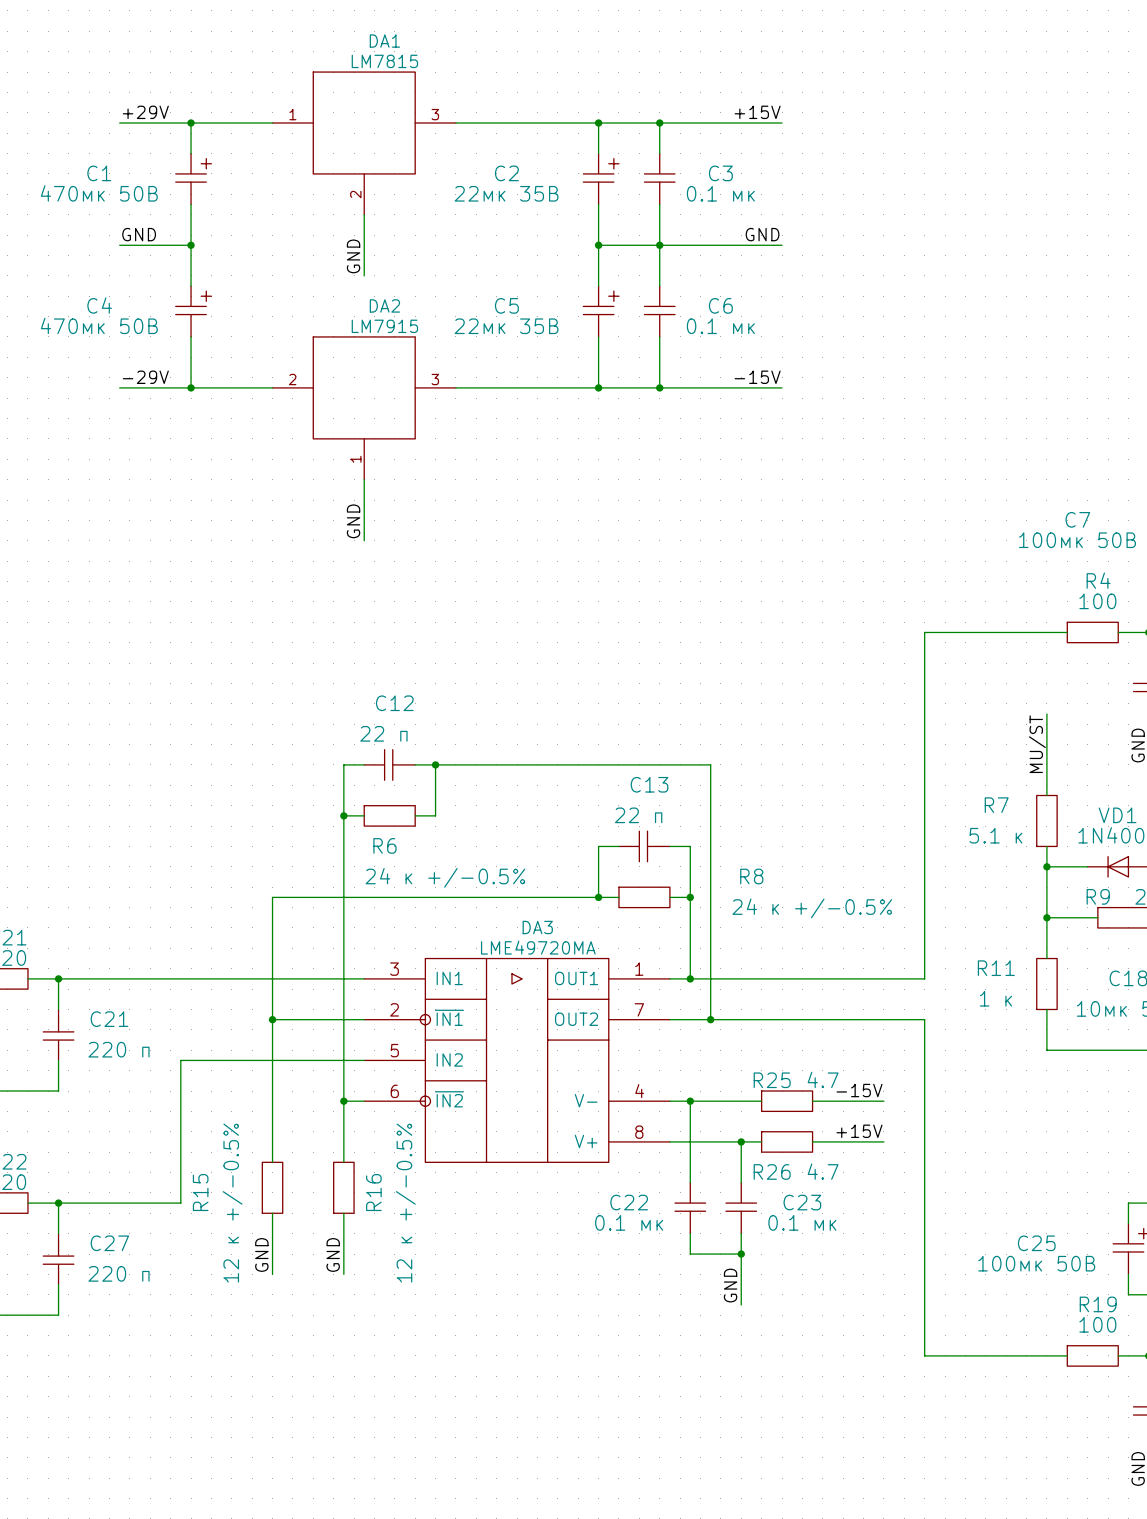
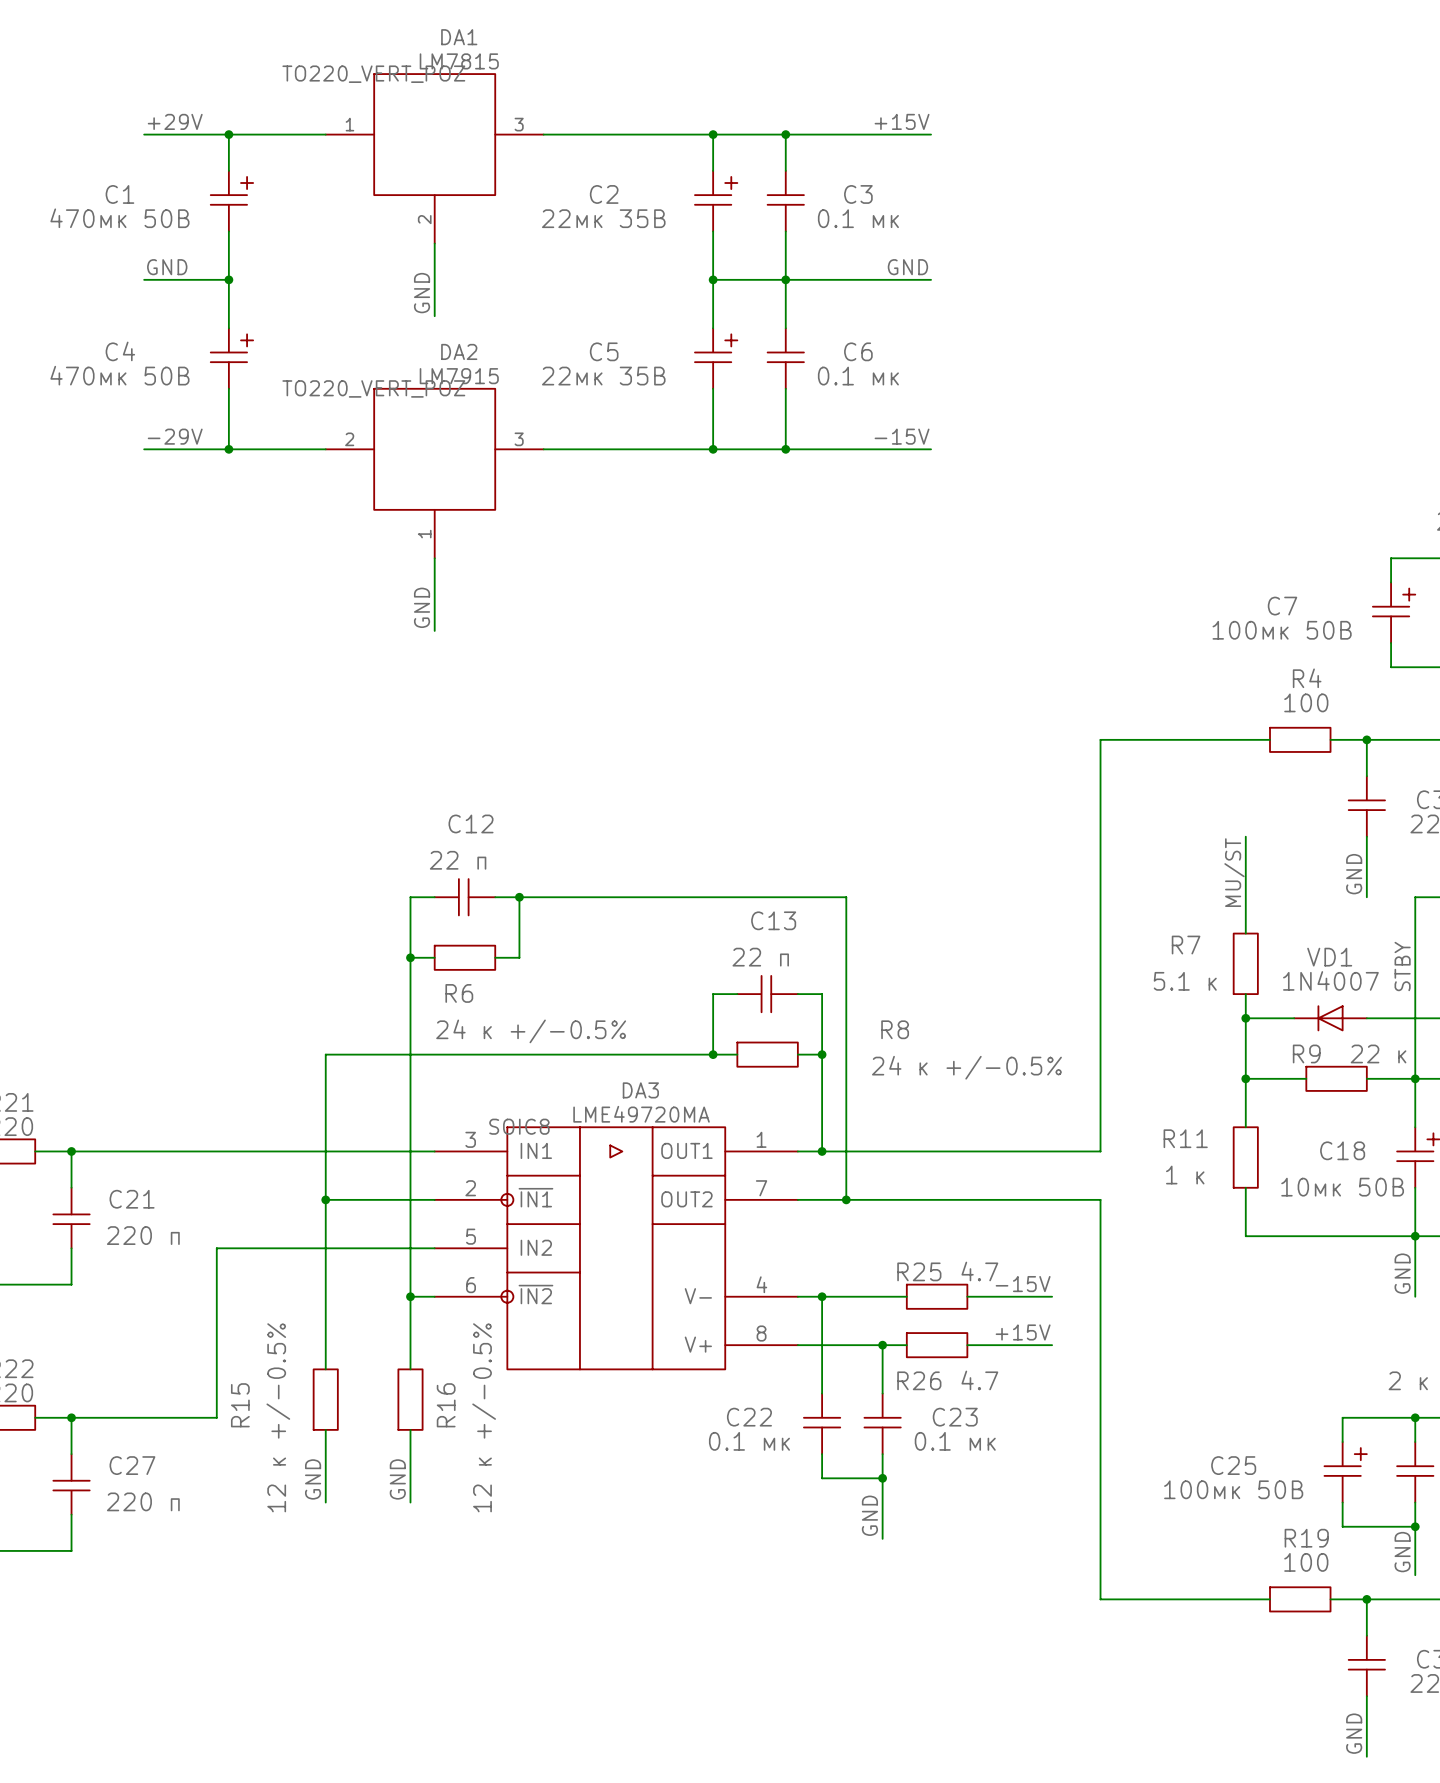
DA1 text: none -> TO220_VERT_POZ (373, 74)
DA2 text: none -> TO220_VERT_POZ (373, 388)
DA3 text: none -> SOIC8 (519, 1126)

